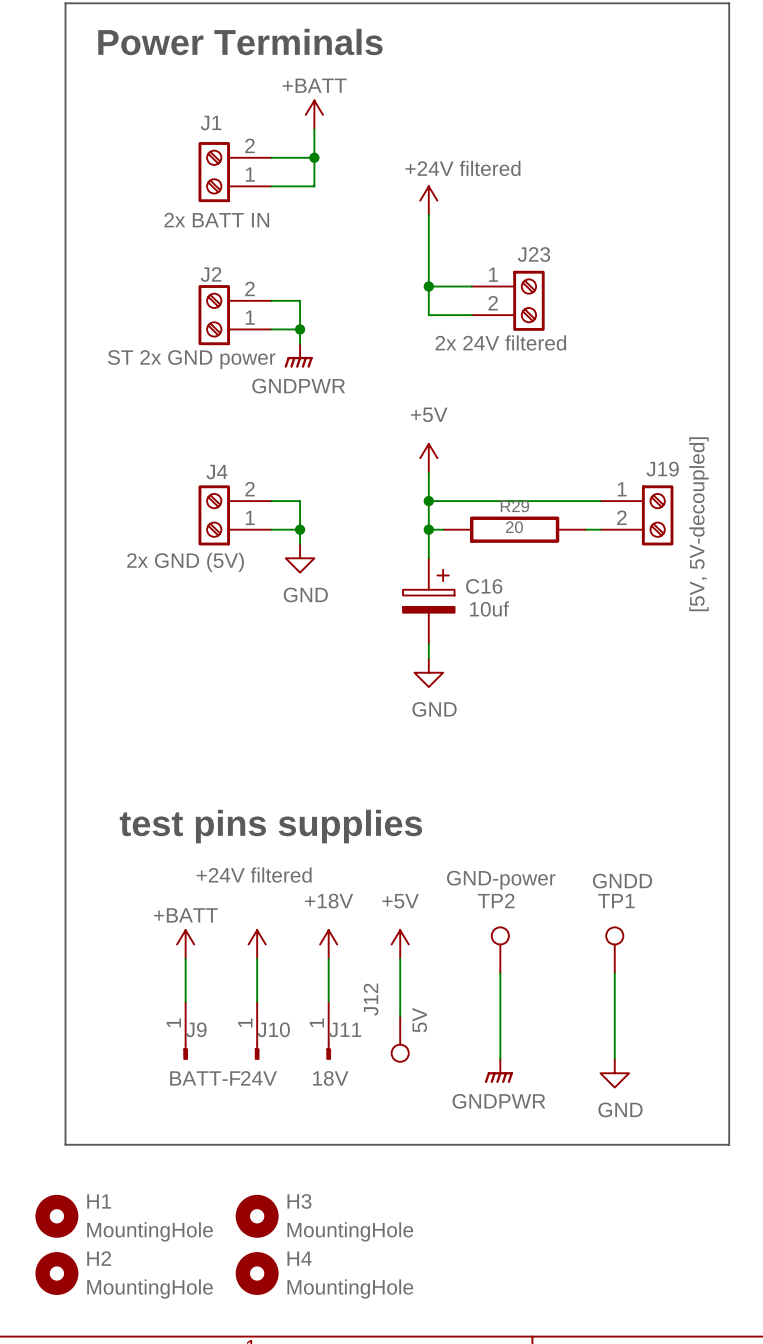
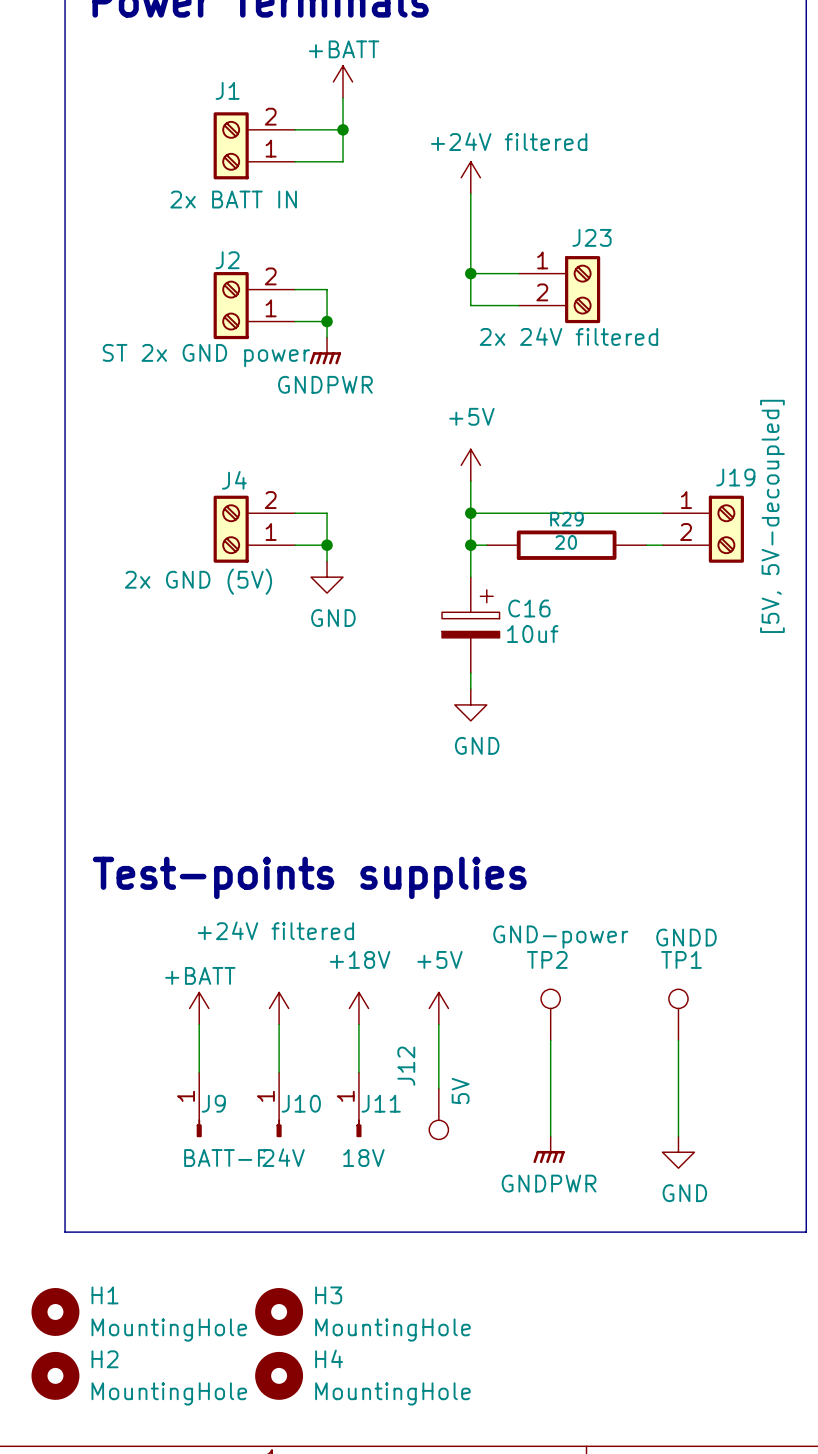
text: test pins supplies (270, 826) -> Test-points supplies (309, 877)

